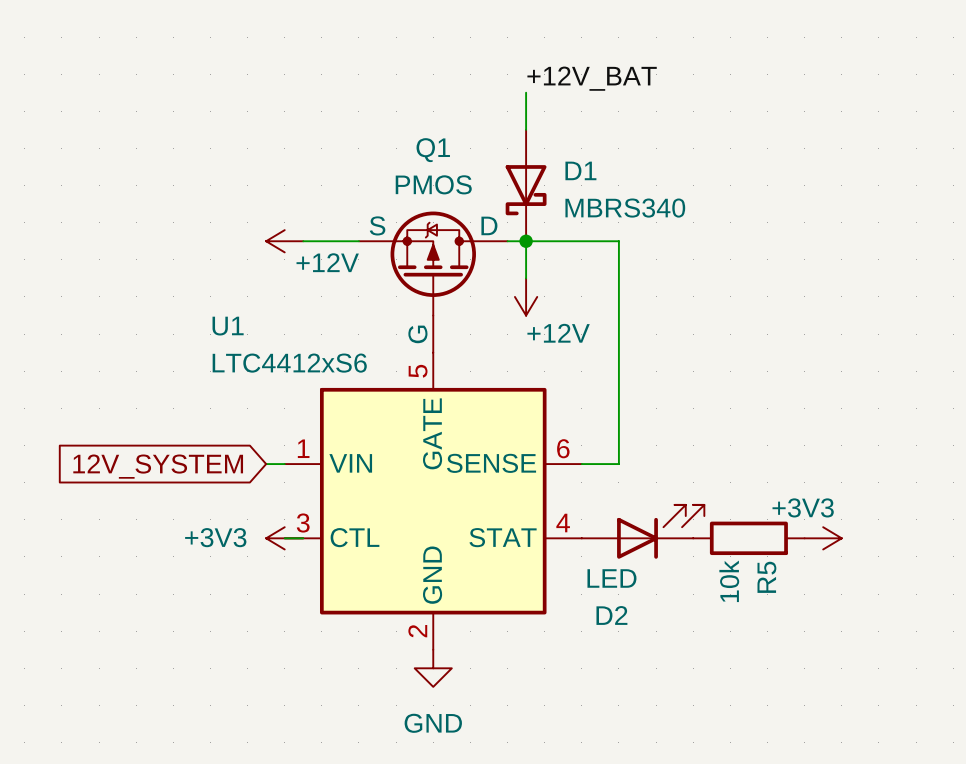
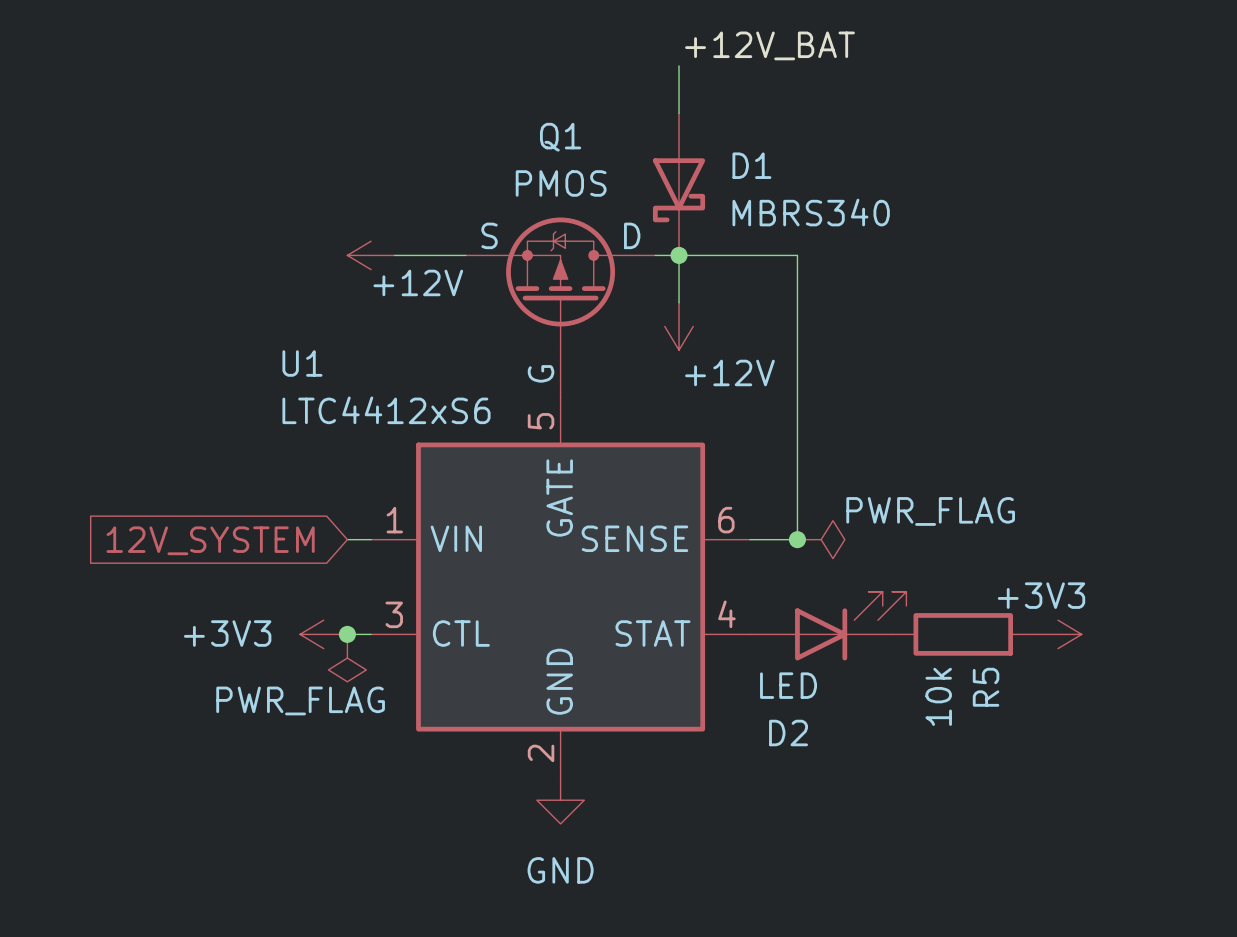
junction: none -> (797, 539)
power symbol: none -> PWR_FLAG (821, 539)
junction: none -> (347, 634)
power symbol position: +3V3 (284, 538) -> +3V3 (323, 634)
power symbol: none -> PWR_FLAG (347, 658)

